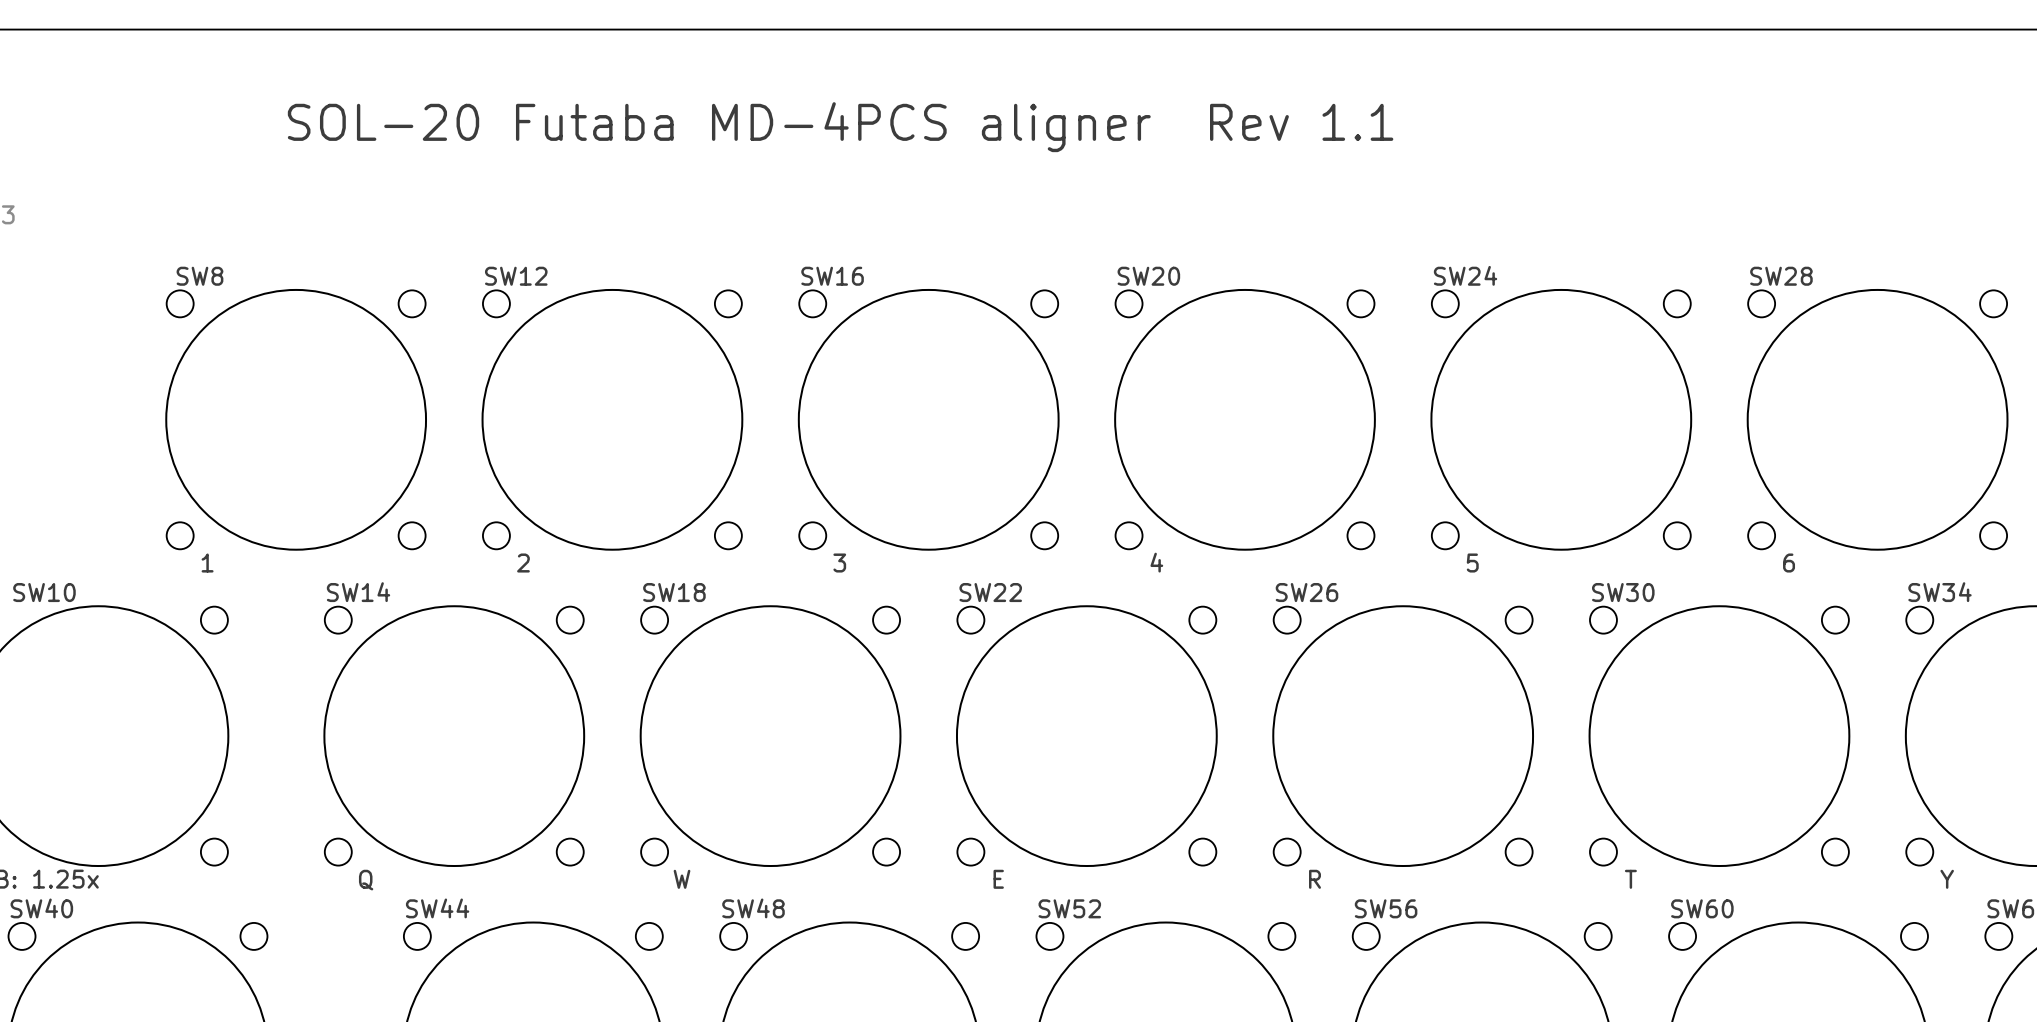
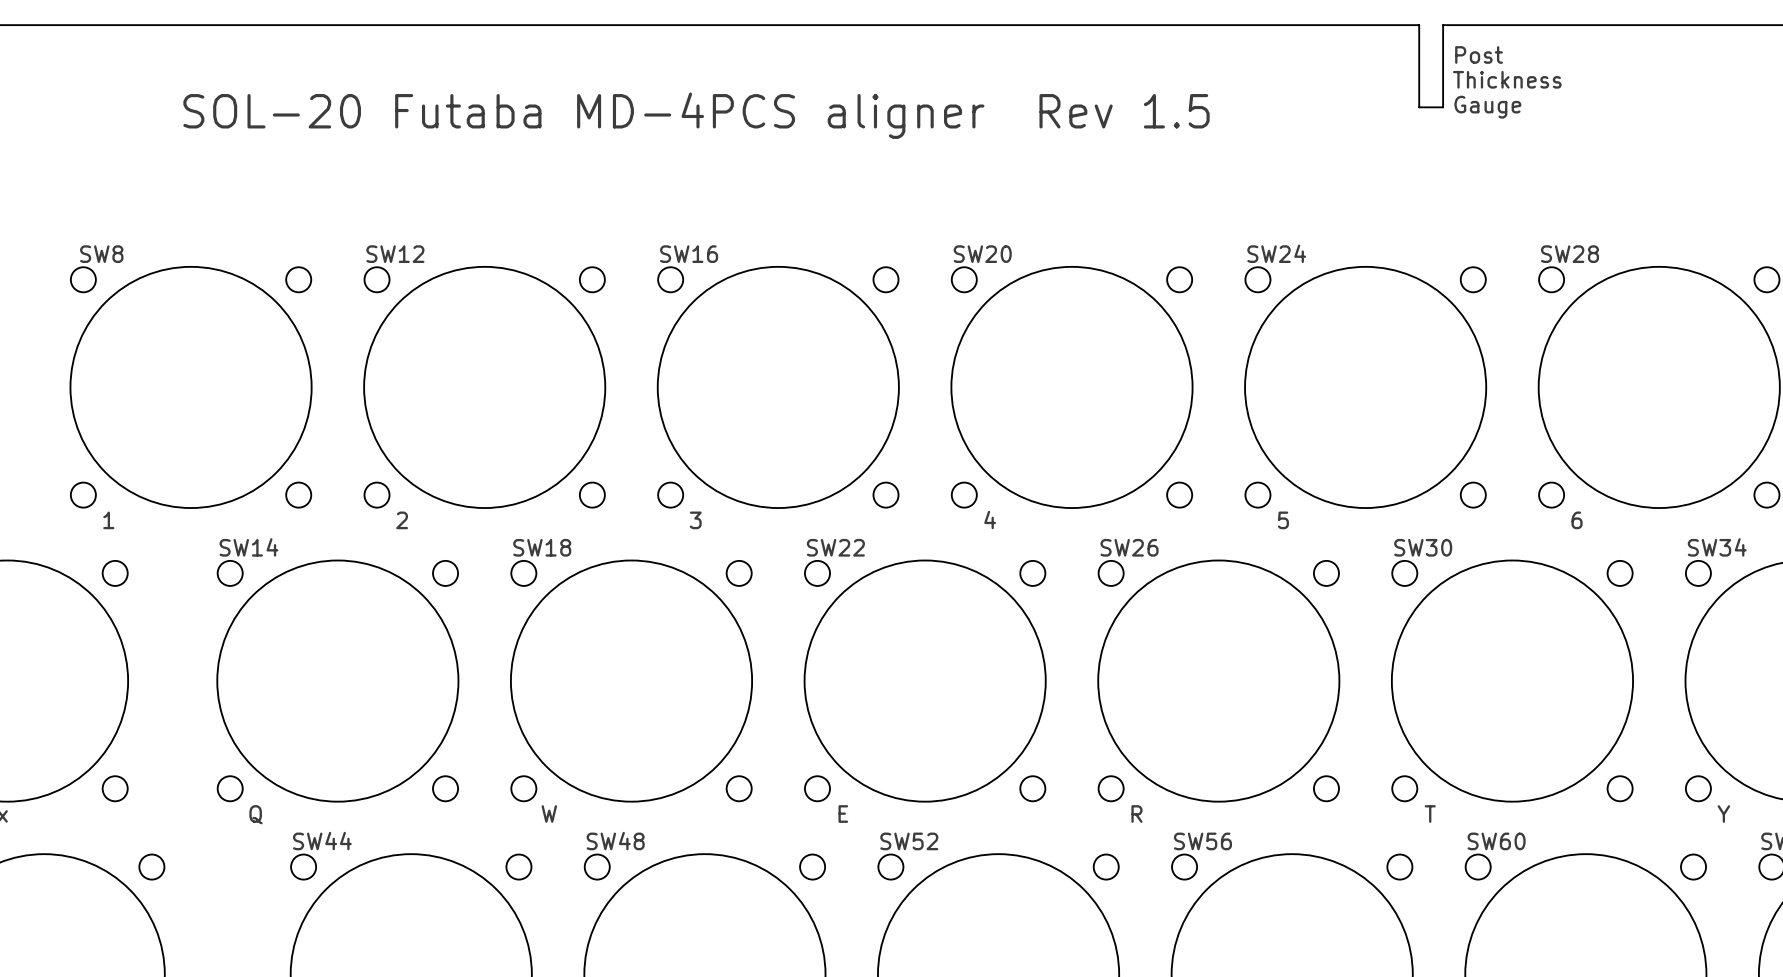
board edge: (1619, 29) (1644, 29) -> (1419, 25) (1419, 107) (1443, 107) (1443, 25)
text: none -> Post (1479, 54)
text: none -> Thickness (1507, 79)
text: none -> Gauge (1487, 107)
text: SOL-20 Futaba MD-4PCS aligner Rev 1.1 (840, 127) -> SOL-20 Futaba MD-4PCS aligner Rev 1.5 (696, 115)

